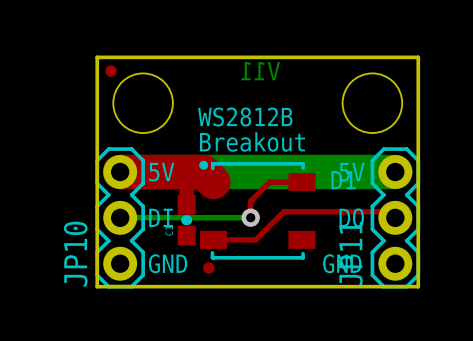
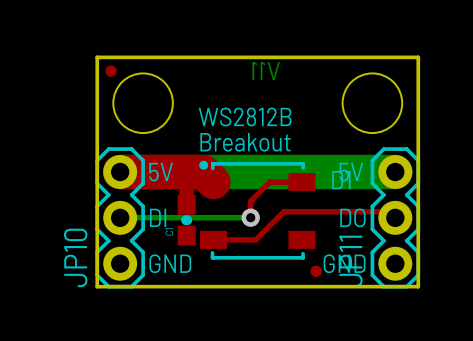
part position: (208, 268) -> (316, 271)

